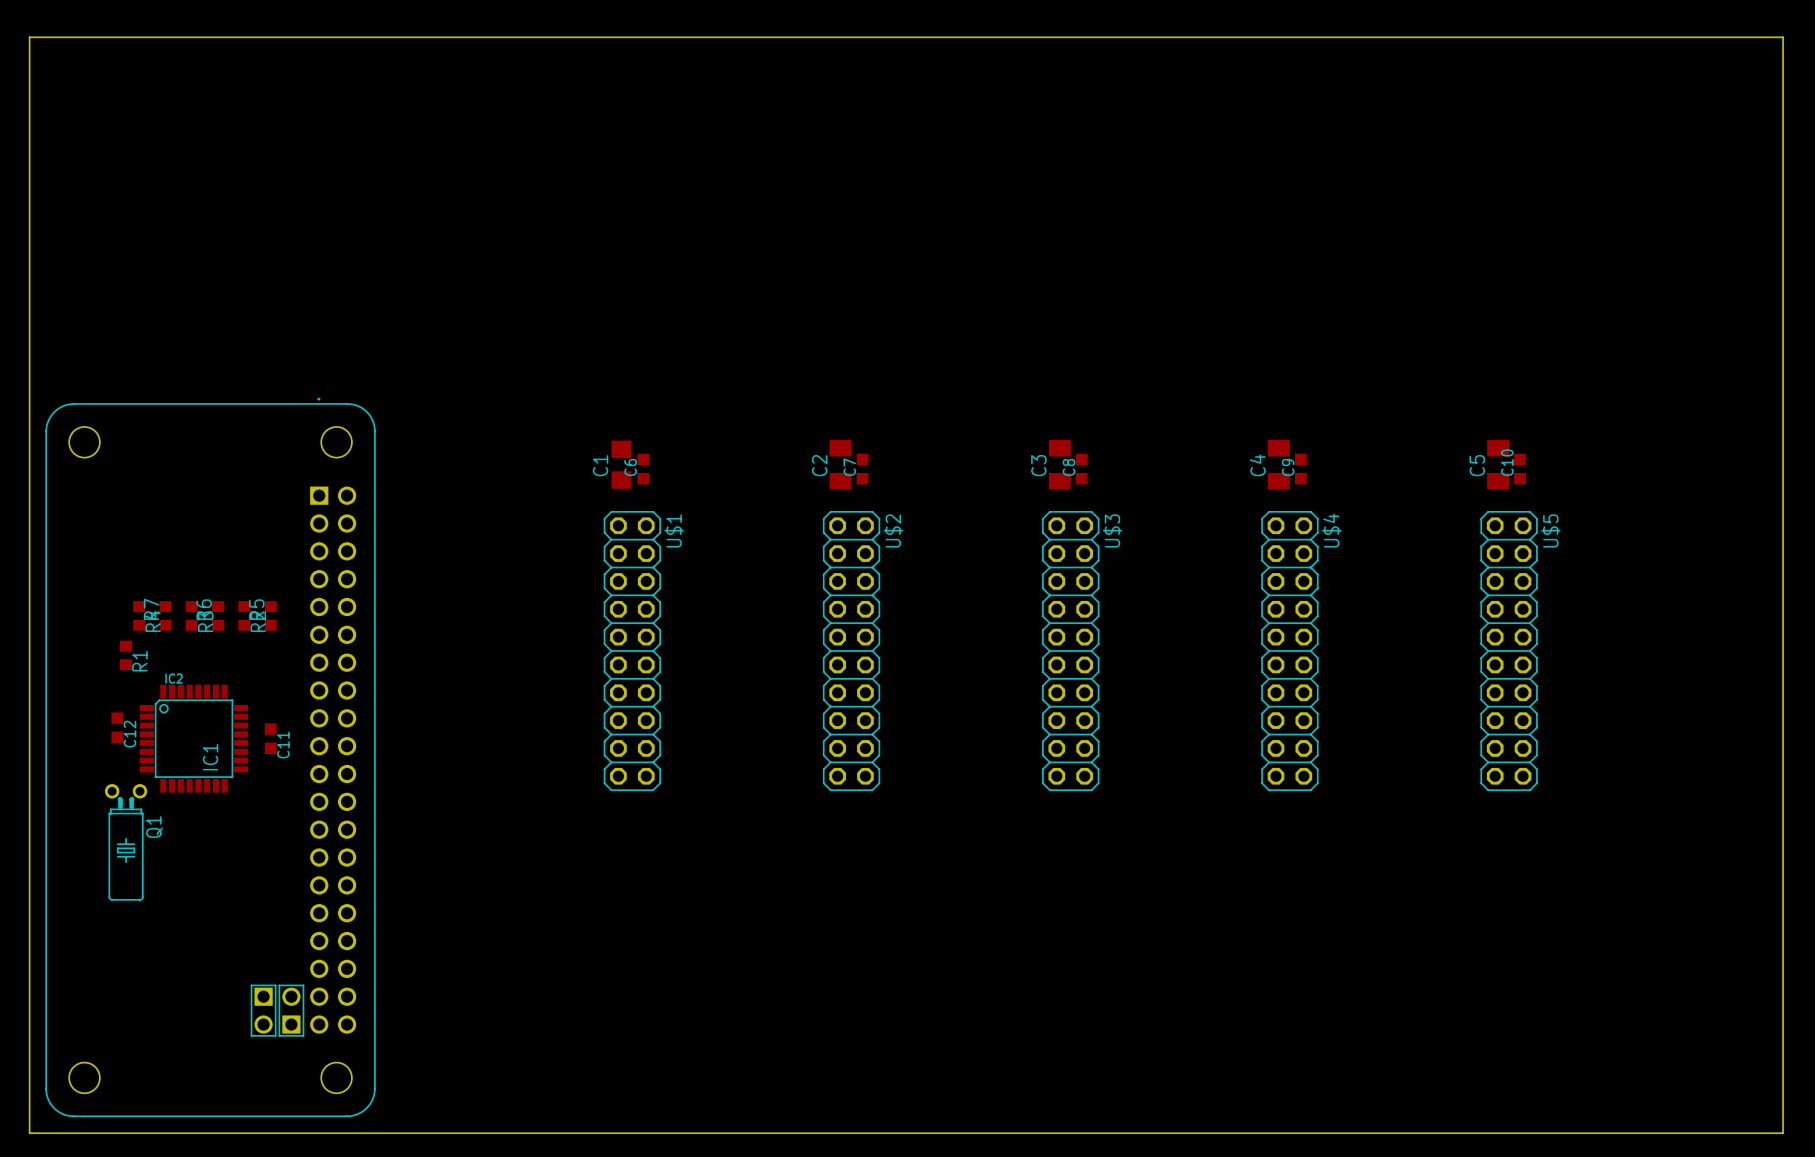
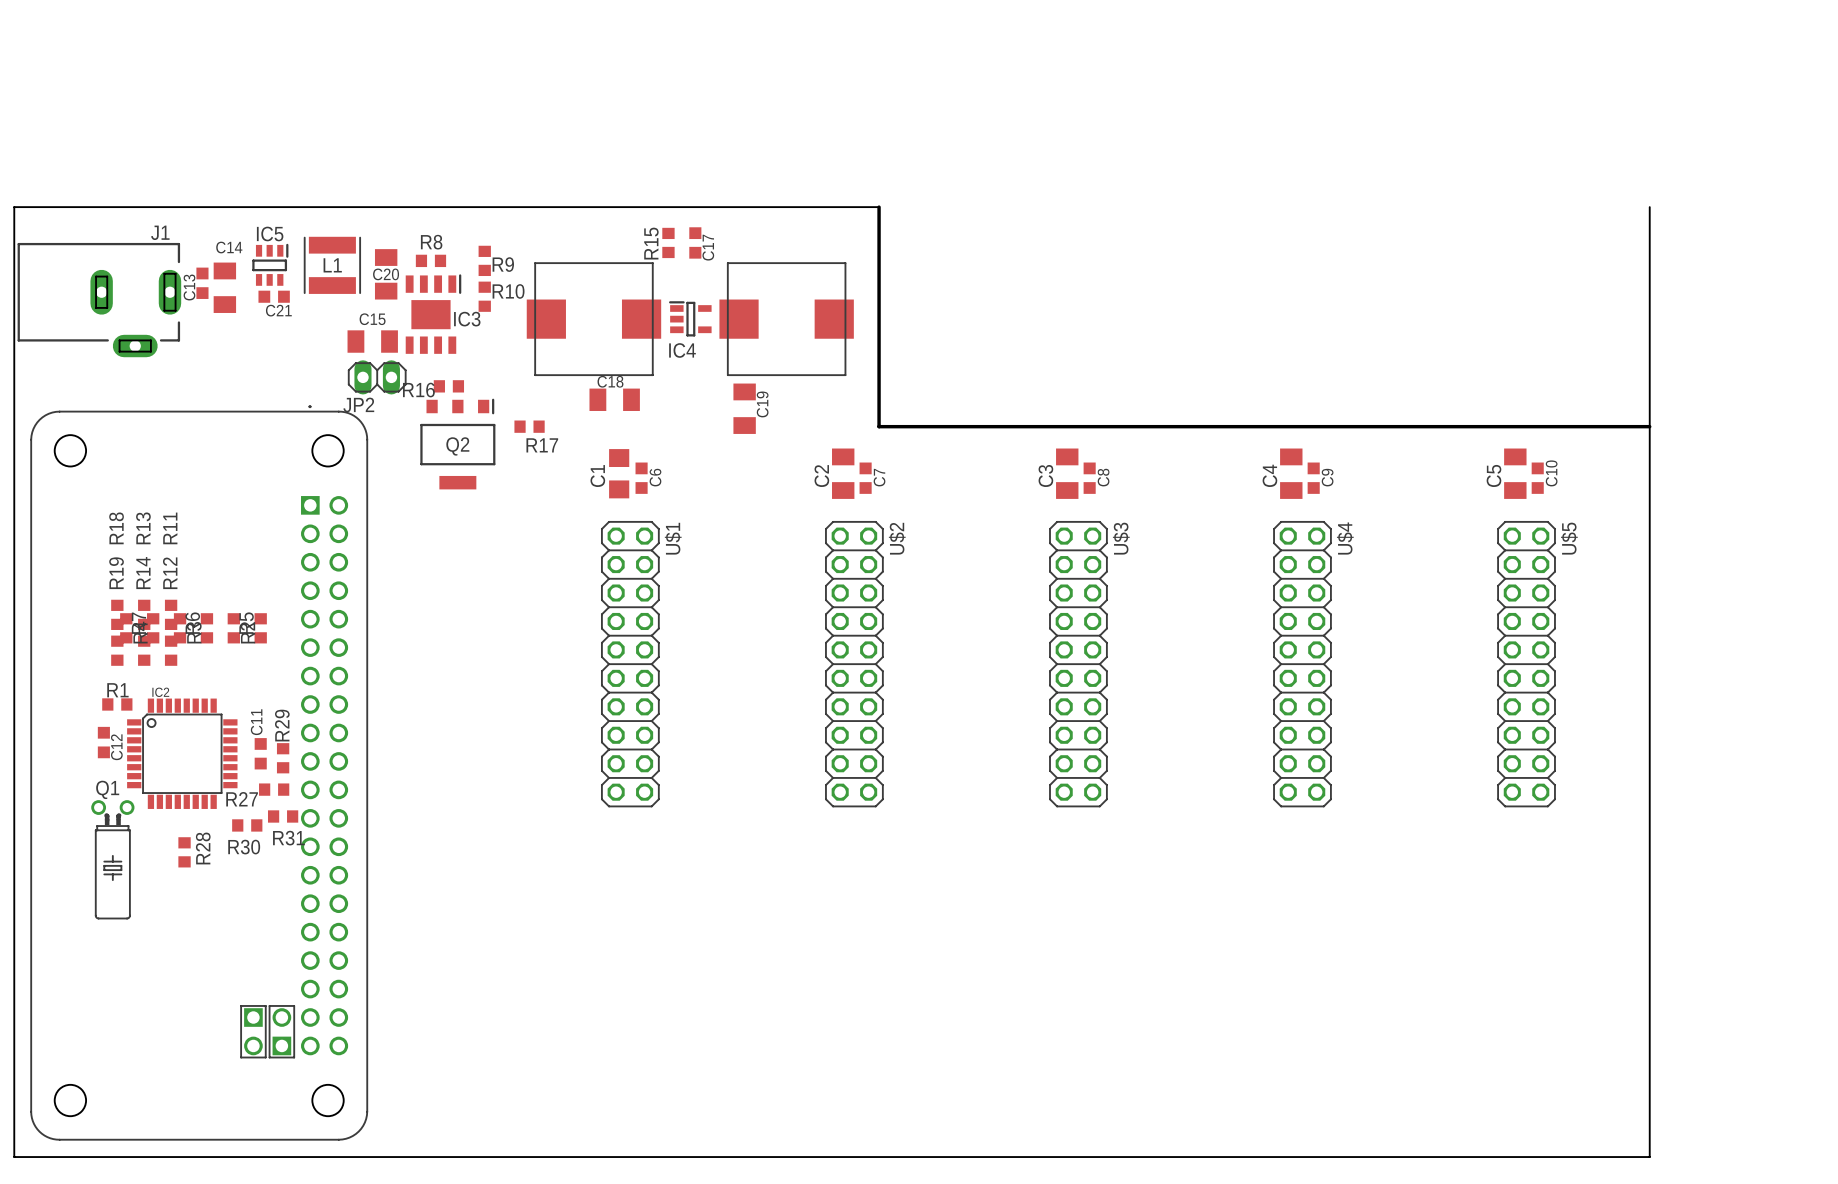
board edge: (29, 203) (29, 37) (1783, 37) (1783, 1133) (1629, 1133) -> (14, 207) (879, 207) (879, 426) (1649, 426)
board edge: none -> (1649, 207) (1649, 1157)
R15: none -> (668, 242)
C17: none -> (695, 242)
R8: none -> (430, 260)
R9: none -> (484, 260)
IC5: none -> (270, 264)
L1: none -> (332, 265)
C20: none -> (386, 274)
C13: none -> (202, 283)
C14: none -> (224, 287)
C21: none -> (274, 296)
R10: none -> (484, 296)
J1: none -> (99, 300)
IC3: none -> (433, 314)
part: none -> (593, 319)
IC4: none -> (690, 318)
part: none -> (786, 319)
C15: none -> (372, 341)
JP2: none -> (377, 377)
R16: none -> (448, 386)
C18: none -> (614, 399)
C19: none -> (744, 408)
R17: none -> (529, 426)
Q2: none -> (457, 444)
C10 name position: C10 (1507, 462) -> C10 (1551, 473)
C6 name position: C6 (630, 467) -> C6 (655, 477)
C7 name position: C7 (849, 467) -> C7 (879, 477)
C8 name position: C8 (1068, 467) -> C8 (1103, 477)
C9 name position: C9 (1288, 467) -> C9 (1327, 477)
R18: none -> (117, 614)
R13: none -> (144, 614)
R11: none -> (171, 614)
R19: none -> (117, 650)
R14: none -> (144, 650)
R12: none -> (171, 650)
R1 rotation: 0° (126, 655) -> 90° clockwise (117, 704)
R1 position: (126, 655) -> (117, 704)
R1 name position: R1 (139, 661) -> R1 (117, 690)
R29: none -> (283, 758)
C11 name position: C11 (283, 745) -> C11 (256, 722)
IC1 name: IC1 (210, 757) -> none
R27: none -> (274, 789)
R31: none -> (283, 816)
R30: none -> (247, 825)
Q1 name rotation: 0° (154, 826) -> 90° clockwise (107, 789)
Q1 name position: Q1 (154, 826) -> Q1 (107, 789)
R28: none -> (184, 852)

